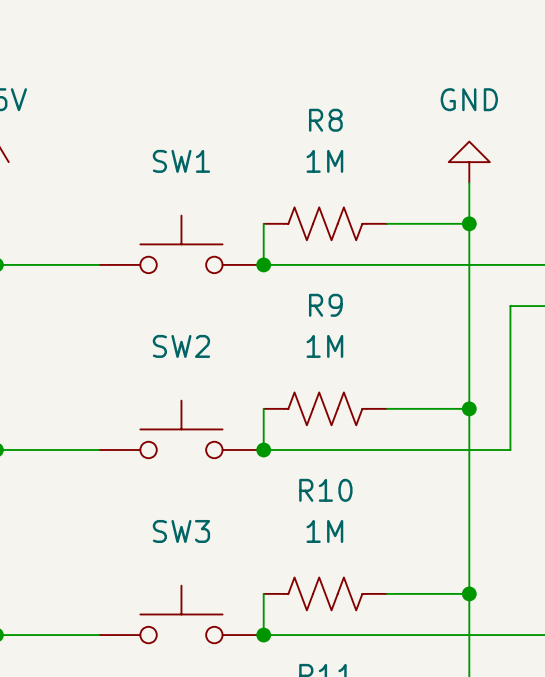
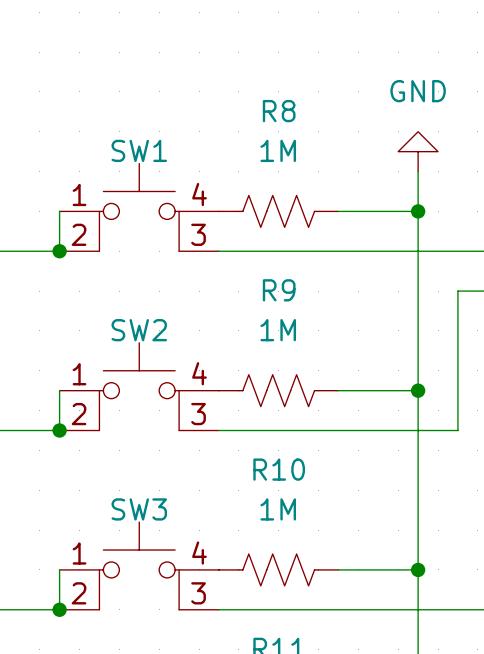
SW1 symbol: [99, 215, 264, 274] -> [59, 163, 219, 252]
wire: (263, 223) (263, 264) -> (59, 211) (59, 251)
junction: none -> (59, 251)
junction: (263, 264) -> none
SW2 symbol: [99, 400, 264, 459] -> [59, 342, 219, 431]
wire: (263, 408) (263, 449) -> (59, 390) (59, 430)
junction: none -> (59, 430)
junction: (263, 449) -> none
SW3 symbol: [99, 585, 264, 644] -> [59, 522, 219, 610]
wire: (263, 593) (263, 635) -> (59, 569) (59, 609)
junction: none -> (59, 609)
junction: (263, 635) -> none

